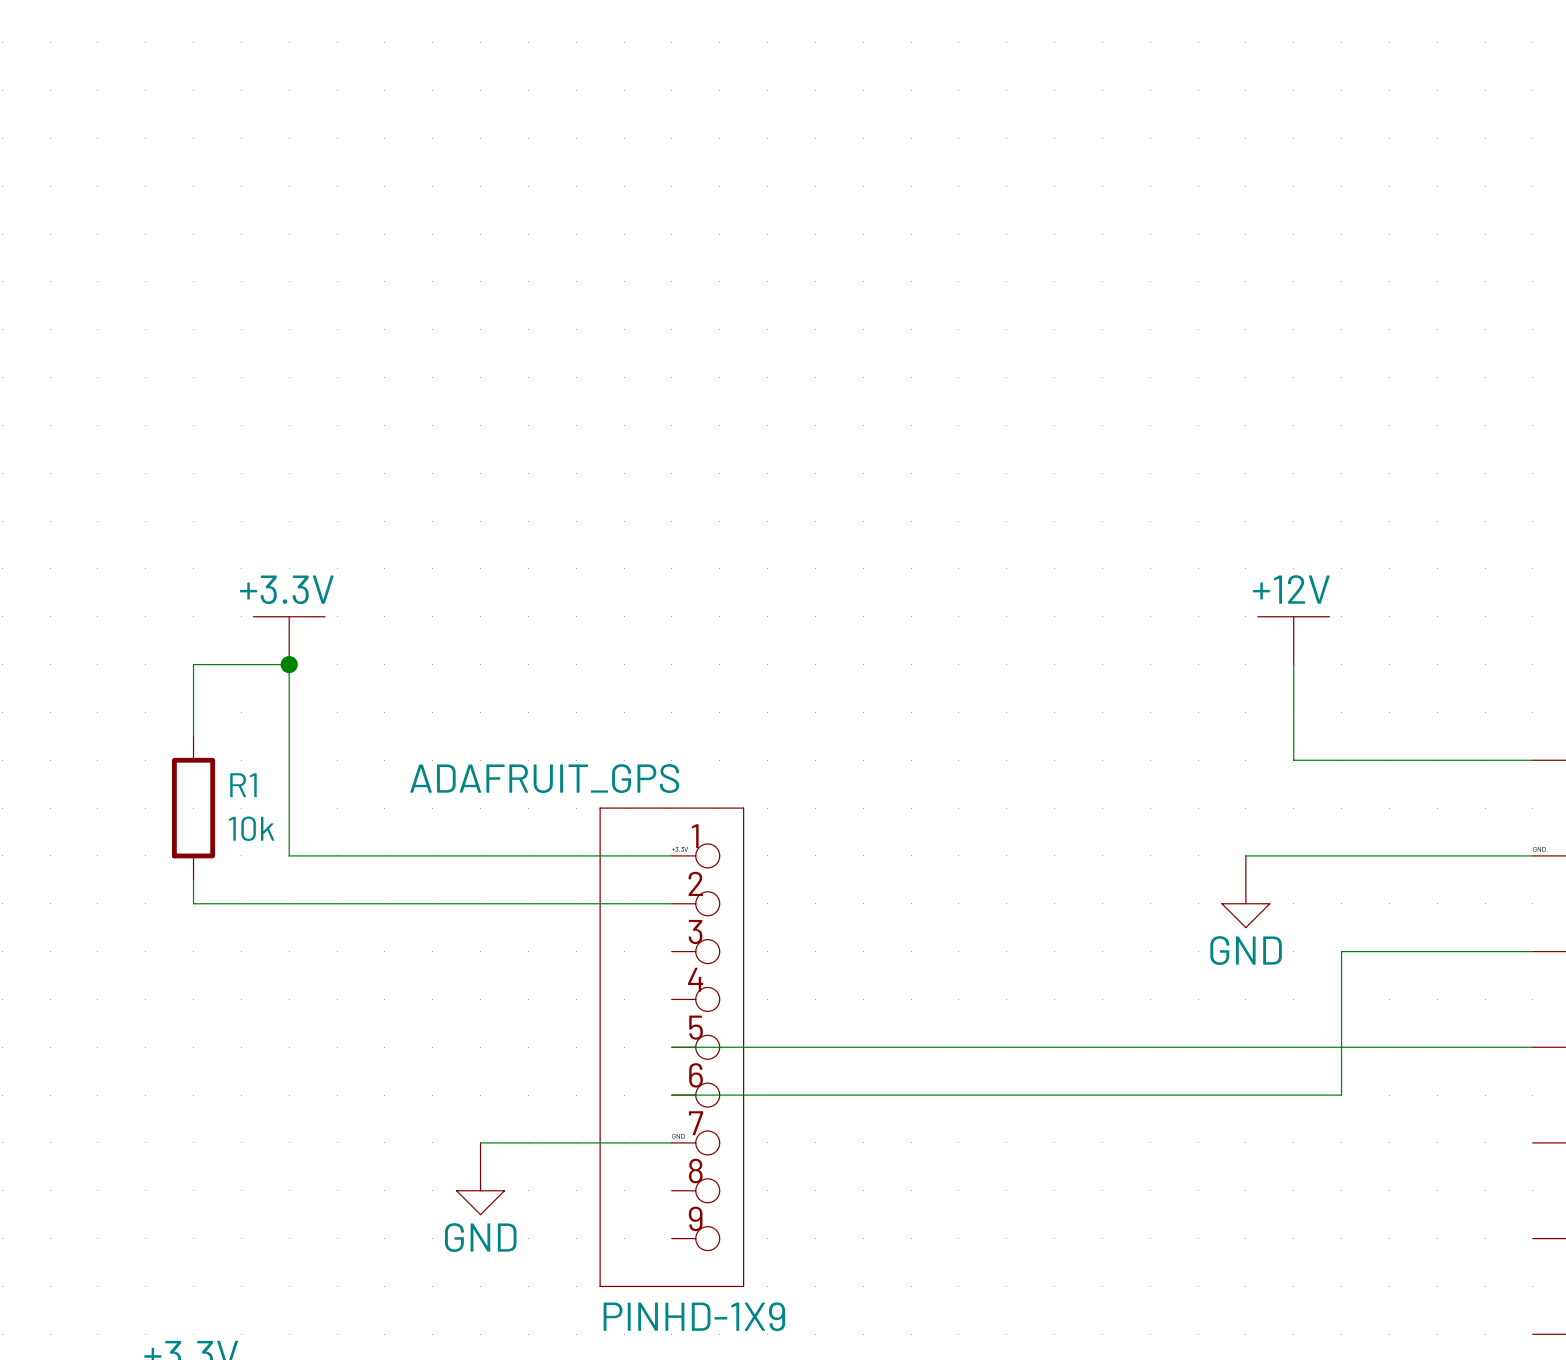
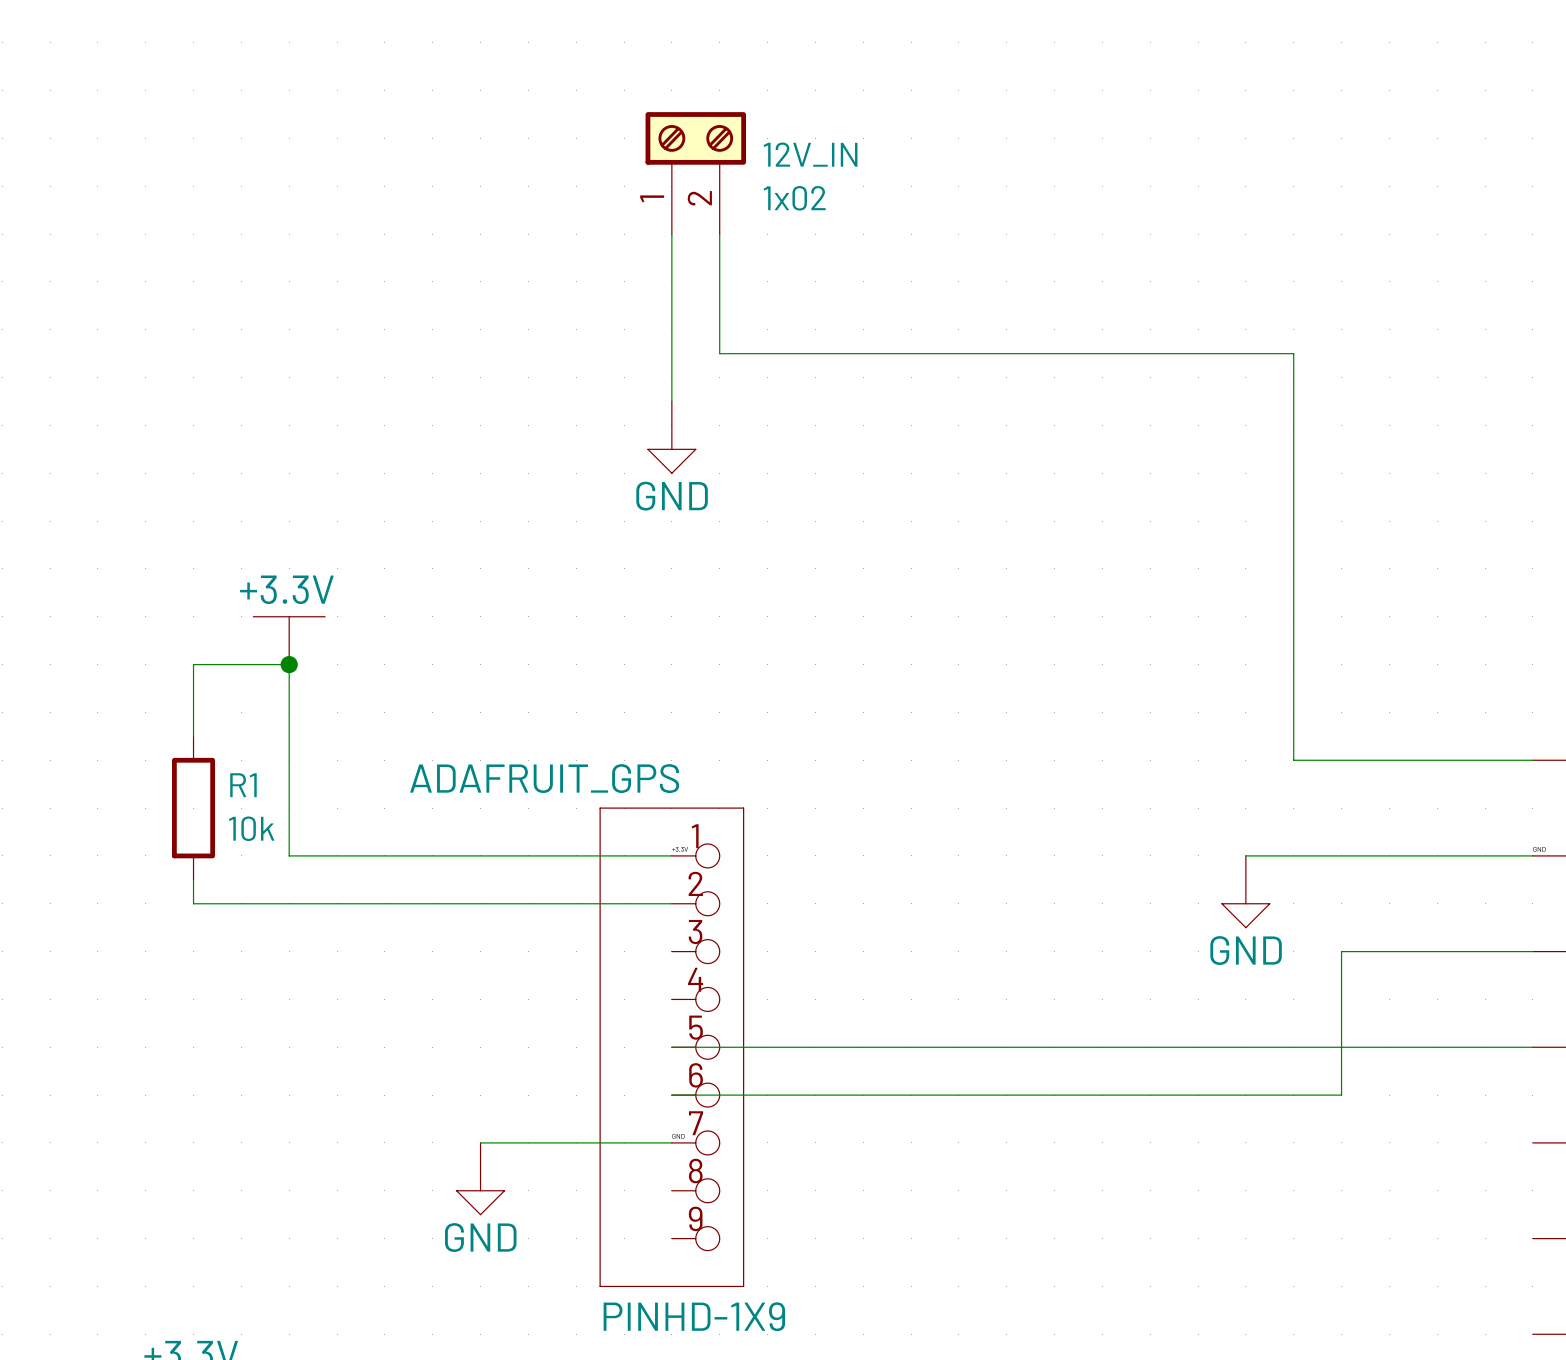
12V_IN: none -> 1x02 (695, 173)
wire: none -> (671, 234) (671, 401)
wire: none -> (719, 234) (719, 353) (1293, 353) (1293, 664)
power symbol: none -> GND (671, 437)
power symbol: +12V (1293, 640) -> none

